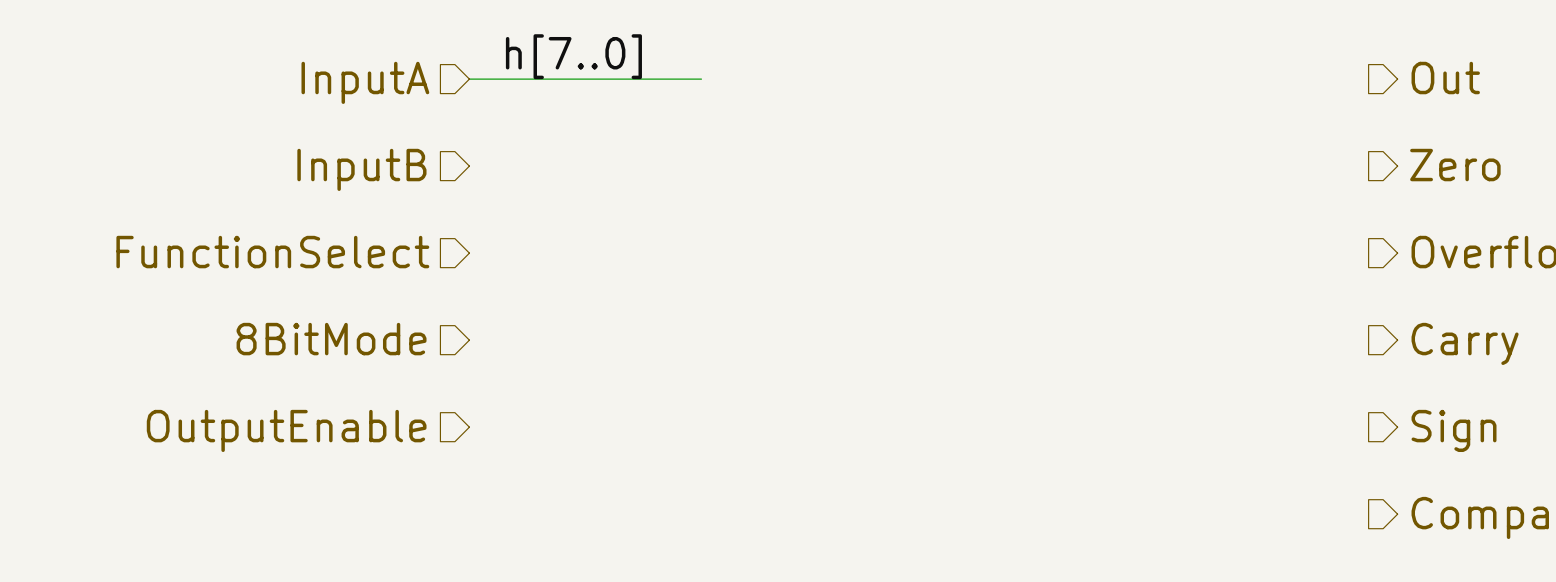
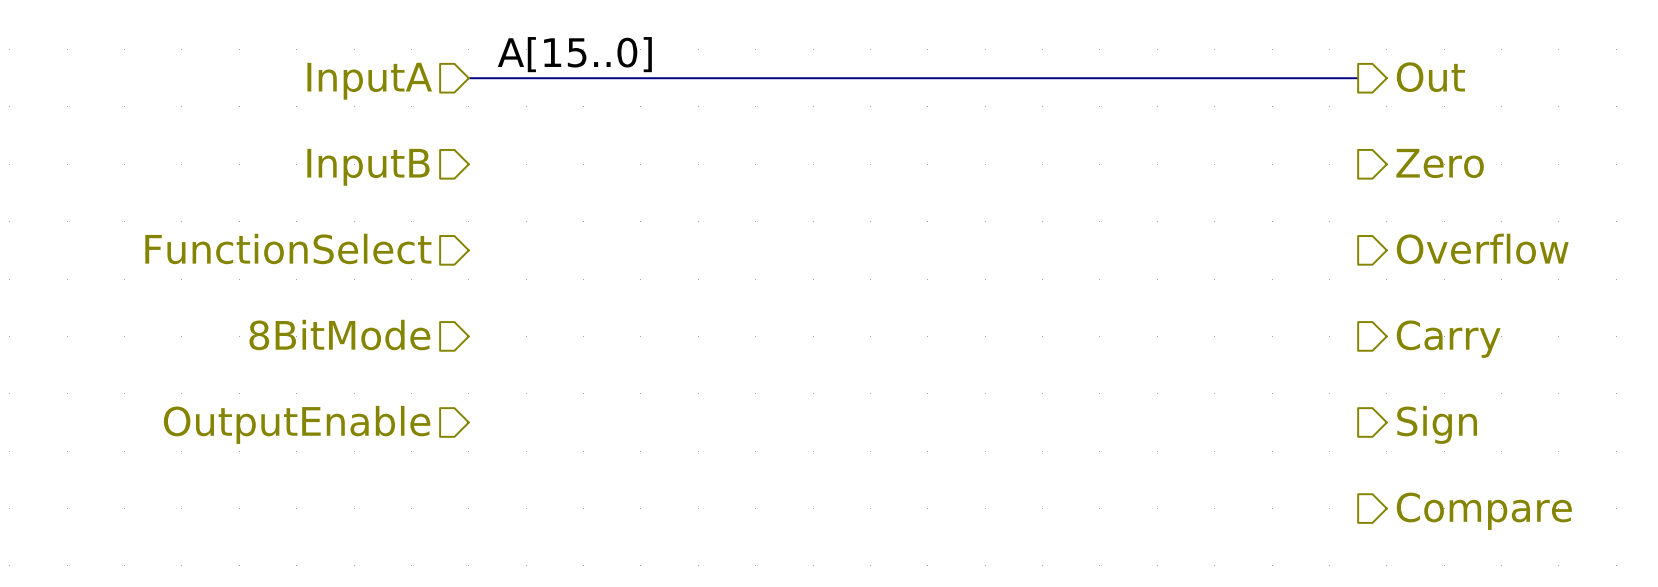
label: h[7..0] (573, 56) -> A[15..0] (574, 54)
bus: none -> (468, 78) (1358, 78)

